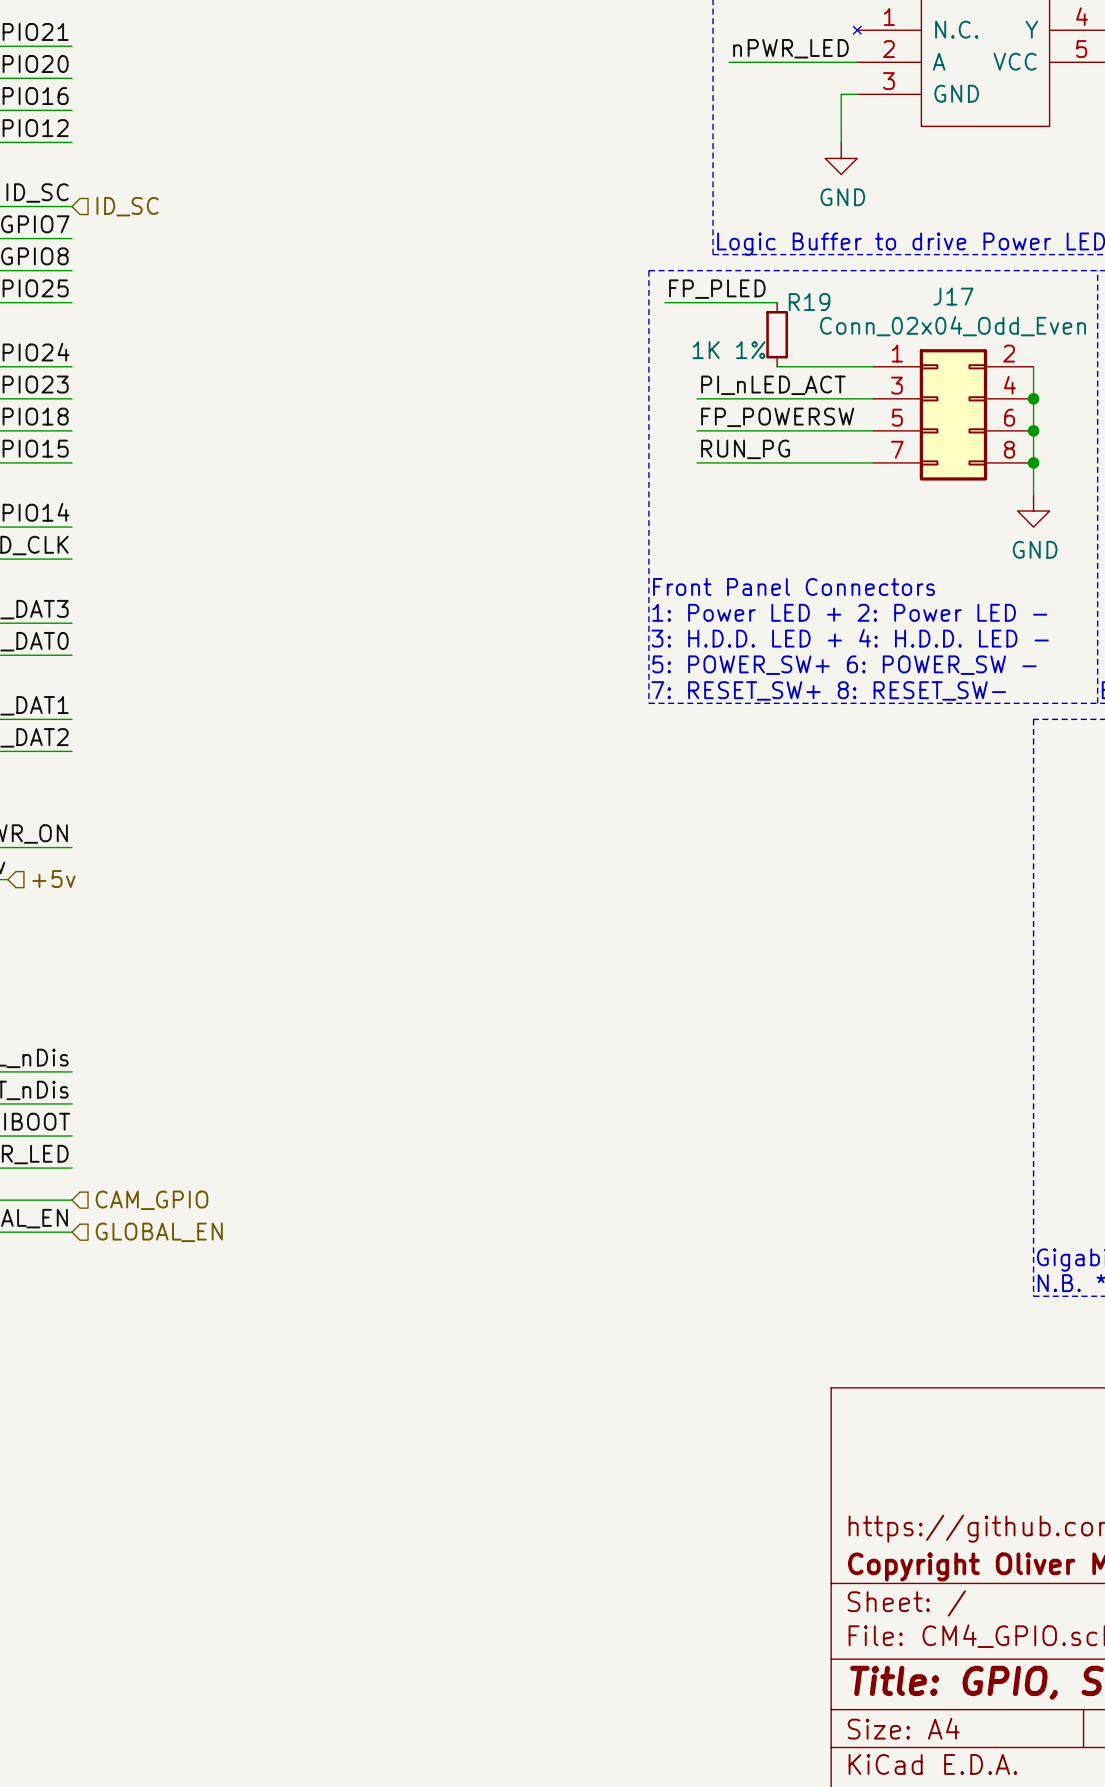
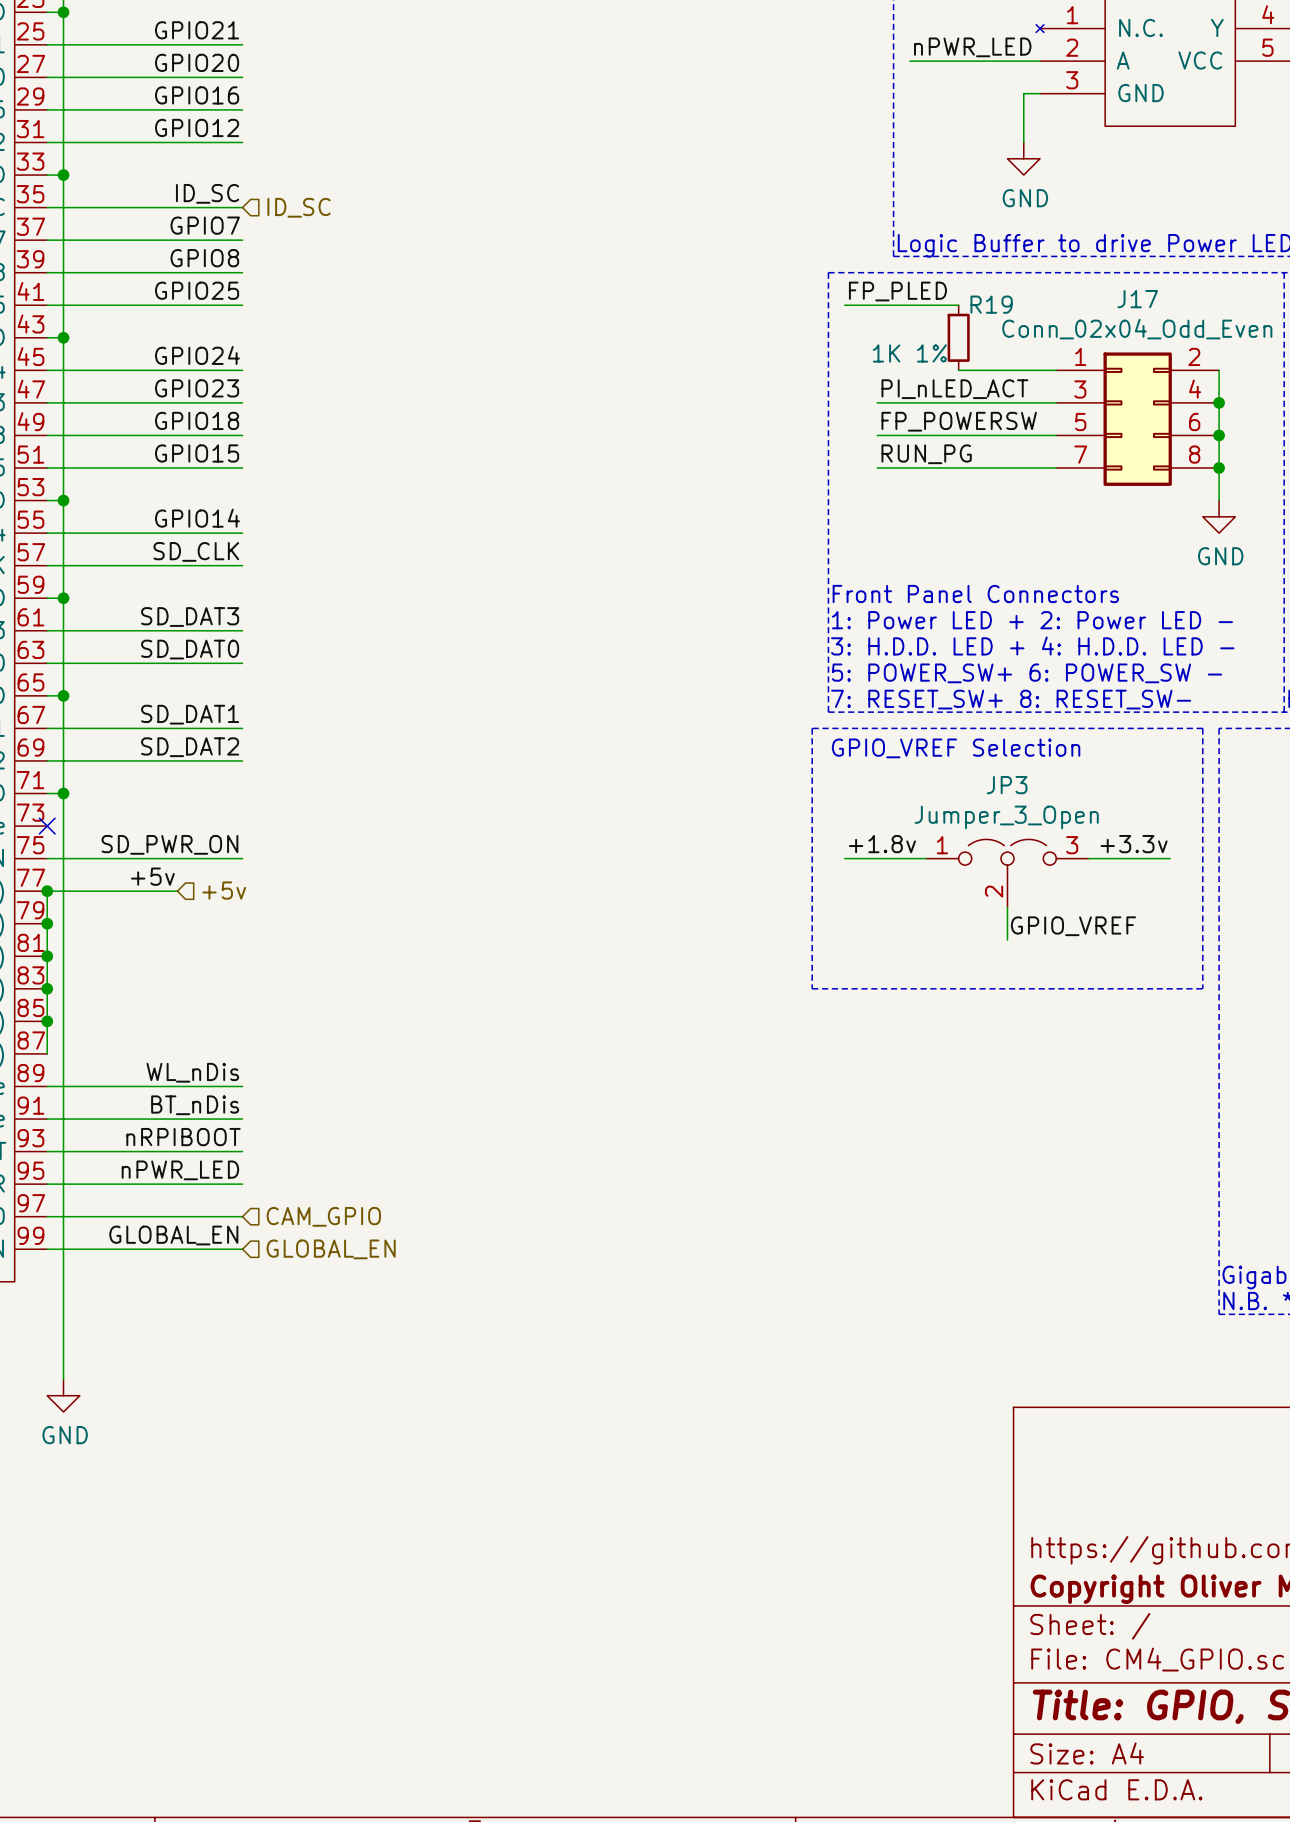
line: none -> (812, 728) (1202, 728) (1202, 988) (812, 988) (812, 728)
text: none -> GPIO_VREF Selection (956, 748)
label: none -> +1.8v (882, 844)
label: none -> +3.3v (1134, 844)
wire: none -> (844, 858) (926, 858)
wire: none -> (1088, 858) (1170, 858)
JP3: none -> Jumper_3_Open (1007, 873)
wire: none -> (1007, 907) (1007, 939)
label: none -> GPIO_VREF (1073, 926)

